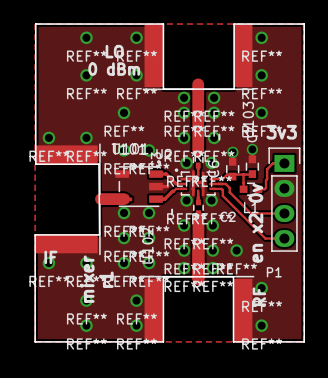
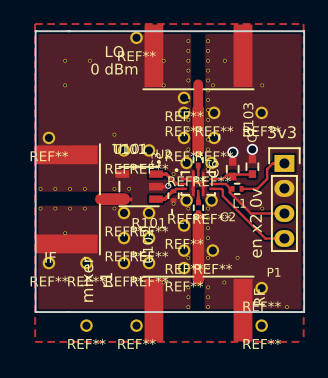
board edge: (35, 24) (163, 24) (163, 89) (234, 89) (234, 24) (304, 24) (304, 341) (233, 341) (233, 276) (163, 276) (163, 341) (35, 341) (35, 234) (99, 234) (98, 164) (35, 164) (35, 24) -> (35, 31) (35, 312) (304, 312) (304, 31) (35, 31)
REF**: (86, 37) -> none
REF**: (261, 37) -> none
part: none -> (188, 41)
part: none -> (208, 41)
part: none -> (188, 50)
part: none -> (208, 50)
part: none -> (65, 60)
part: none -> (89, 60)
part: none -> (163, 60)
part: none -> (188, 60)
part: none -> (208, 60)
part: none -> (224, 60)
part: none -> (188, 70)
part: none -> (208, 70)
REF**: (86, 75) -> none
REF**: (136, 75) -> none
REF**: (261, 75) -> none
part: none -> (188, 80)
part: none -> (208, 80)
top track width: thick (198, 84) (198, 109) -> thin (198, 84) (198, 109)
part: none -> (65, 85)
part: none -> (163, 85)
part: none -> (212, 85)
part: none -> (262, 85)
part: none -> (208, 90)
REF**: (214, 97) -> none
part: none -> (188, 100)
part: none -> (208, 100)
part: none -> (188, 110)
part: none -> (208, 110)
REF**: (124, 112) -> none
part: none -> (188, 119)
part: none -> (208, 119)
part: none -> (188, 129)
part: none -> (114, 134)
REF**: (86, 137) -> none
part: none -> (208, 139)
part: none -> (188, 149)
part: none -> (208, 149)
part: none -> (208, 169)
part: none -> (173, 174)
top track: (243, 174) (243, 182) -> none
top track: (266, 180) (266, 188) (258, 189) -> (266, 180) (257, 188) (241, 188)
L1 footprint: [239, 182, 263, 196] -> [230, 182, 244, 195]
top track: (243, 183) (243, 189) -> none
via: none -> (168, 185)
part: none -> (40, 188)
part: none -> (55, 188)
part: none -> (70, 188)
part: none -> (84, 188)
part: none -> (114, 188)
part: none -> (129, 188)
R101: none -> (173, 195)
part: none -> (173, 203)
part: none -> (40, 208)
part: none -> (55, 208)
part: none -> (70, 208)
part: none -> (84, 208)
part: none -> (114, 208)
part: none -> (188, 208)
part: none -> (208, 208)
part: none -> (262, 208)
part: none -> (208, 218)
REF**: (212, 225) -> none
part: none -> (208, 228)
part: none -> (65, 233)
part: none -> (208, 238)
REF**: (236, 250) -> none
part: none -> (188, 257)
part: none -> (208, 257)
part: none -> (237, 257)
part: none -> (208, 267)
REF**: (212, 268) -> none
part: none -> (163, 282)
part: none -> (224, 282)
part: none -> (188, 287)
part: none -> (208, 287)
part: none -> (188, 297)
part: none -> (208, 297)
REF**: (86, 300) -> none
REF**: (136, 300) -> none
part: none -> (188, 307)
part: none -> (208, 307)
part: none -> (286, 307)

